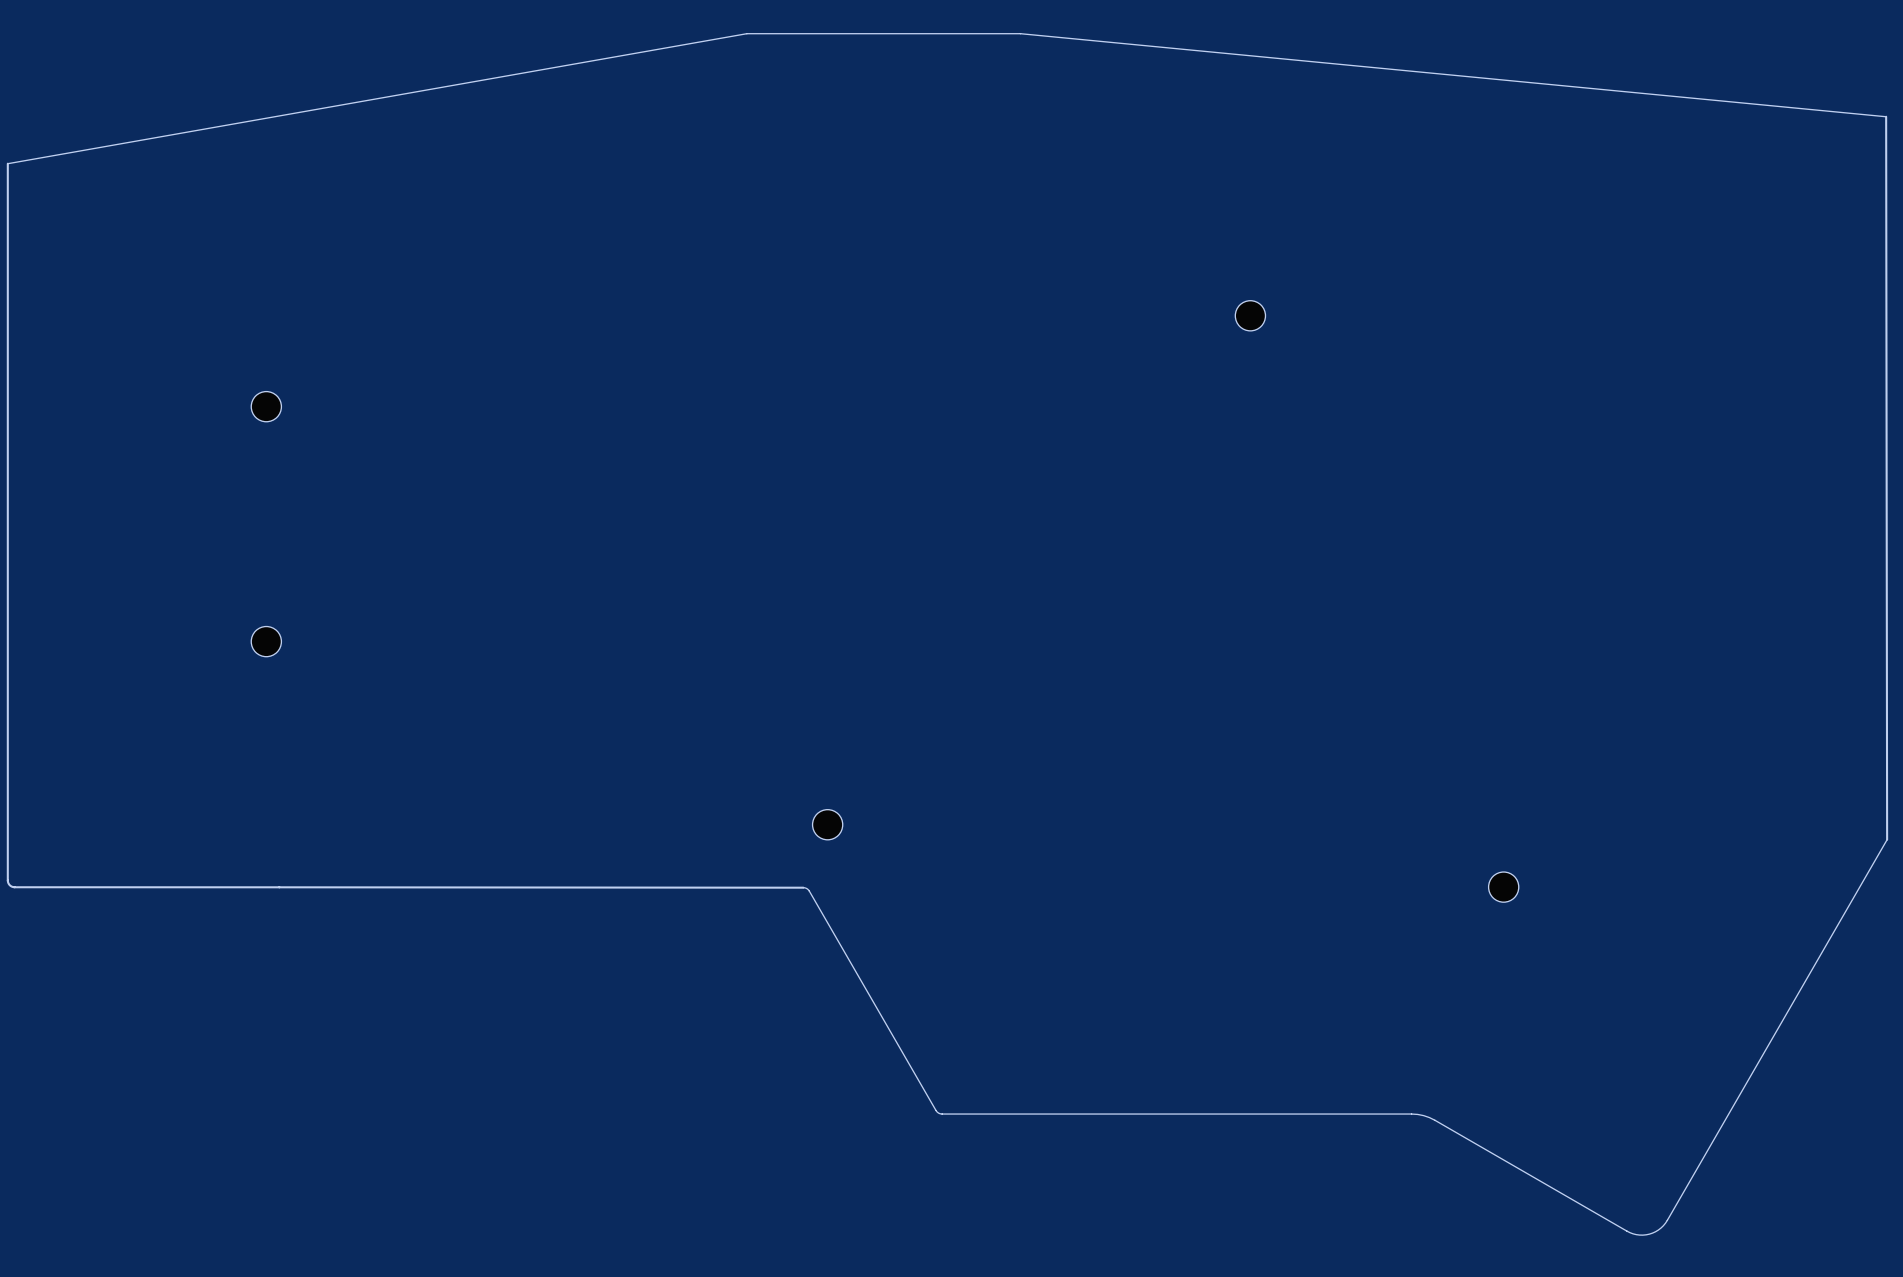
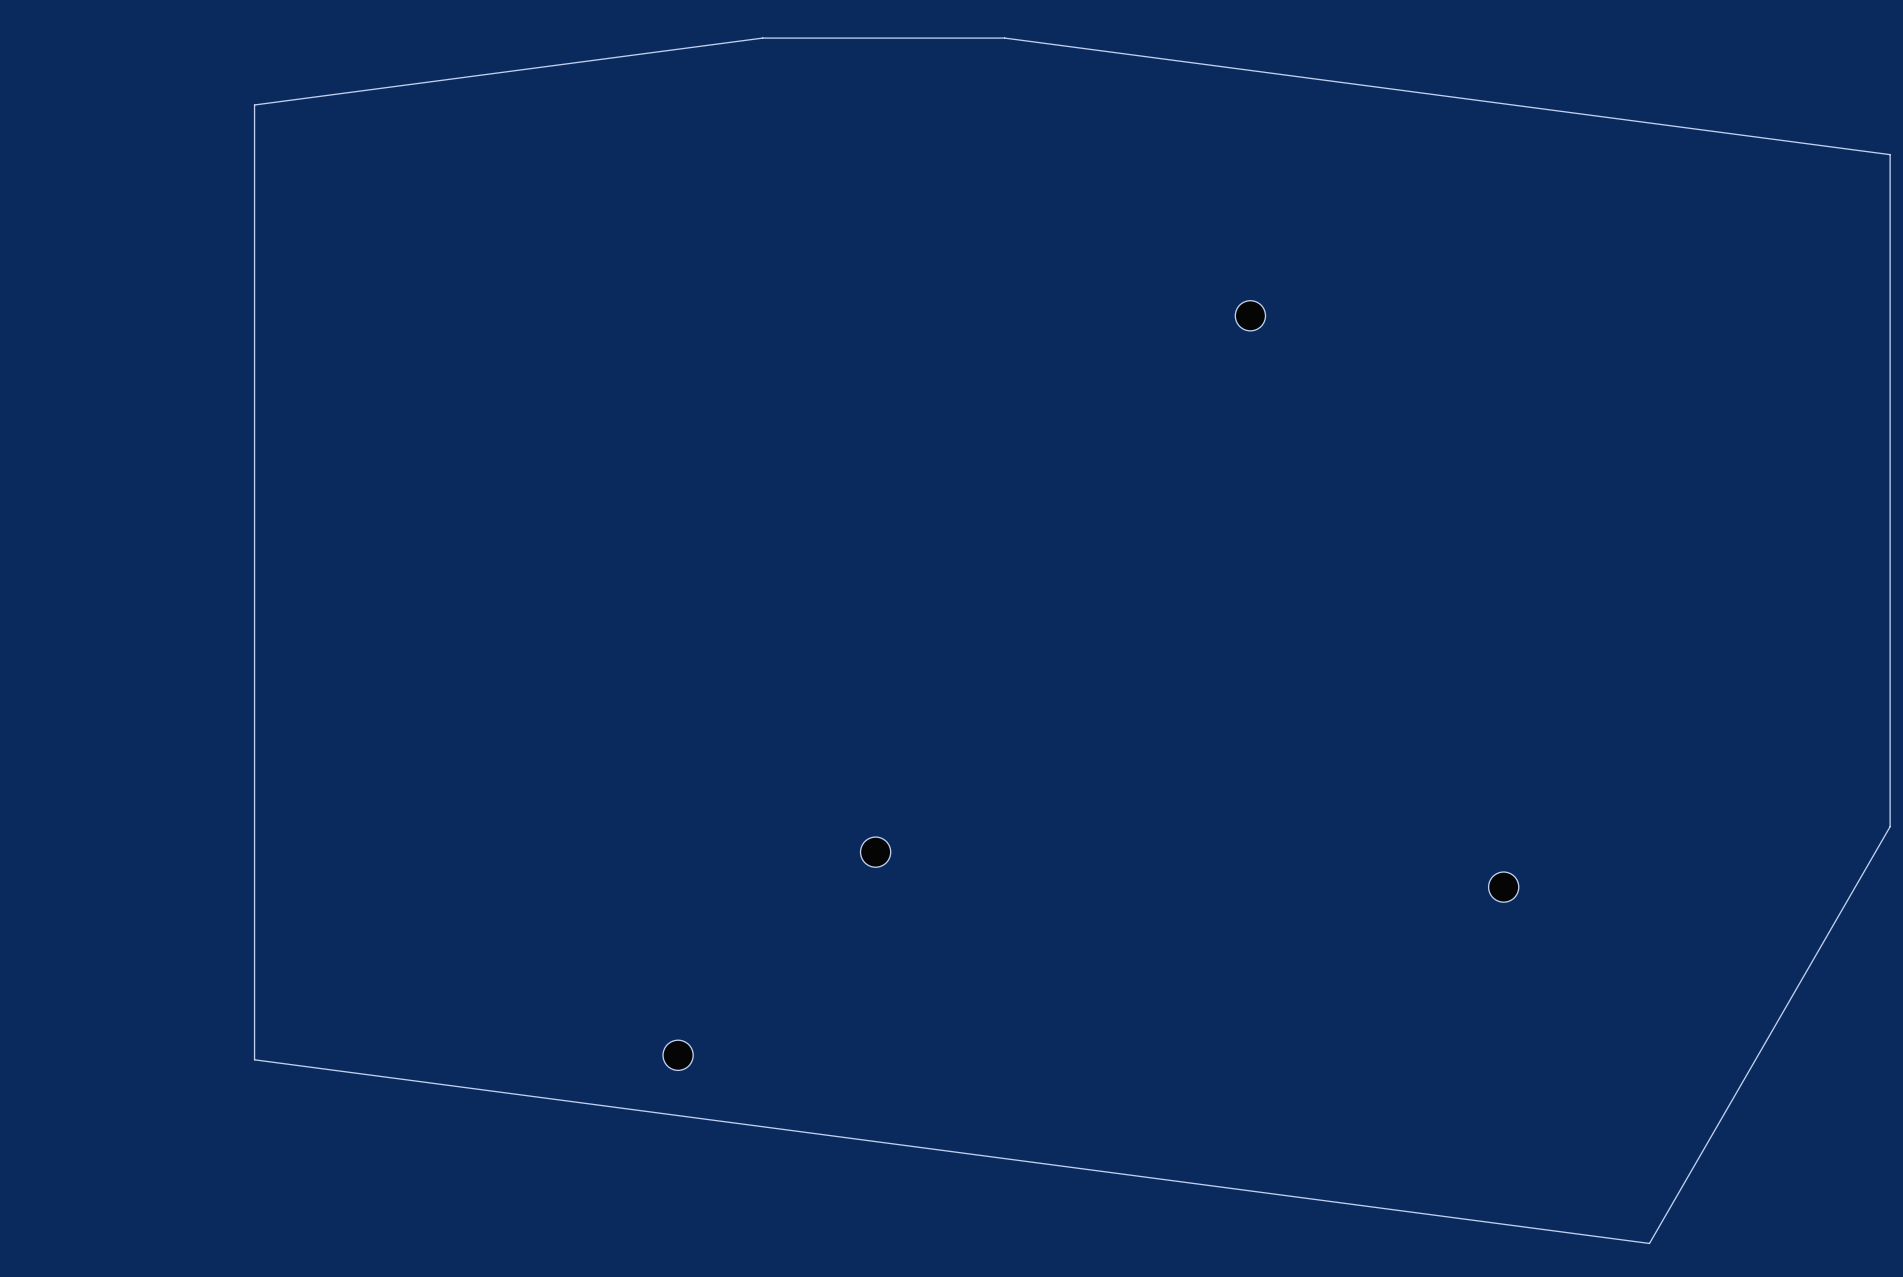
board edge: (746, 33) (7, 163) (9, 884) (14, 887) (805, 887) (809, 891) (939, 1113) (1417, 1114) (1434, 1120) (1630, 1232) (1642, 1235) (1658, 1230) (1667, 1220) (1887, 839) (1886, 116) (1020, 33) (746, 33) -> (762, 38) (254, 104) (254, 1059) (1649, 1243) (1890, 826) (1890, 154) (1004, 38) (762, 38)
part: (266, 406) -> none
part: (266, 641) -> none
part position: (827, 824) -> (875, 852)
part: none -> (678, 1055)

